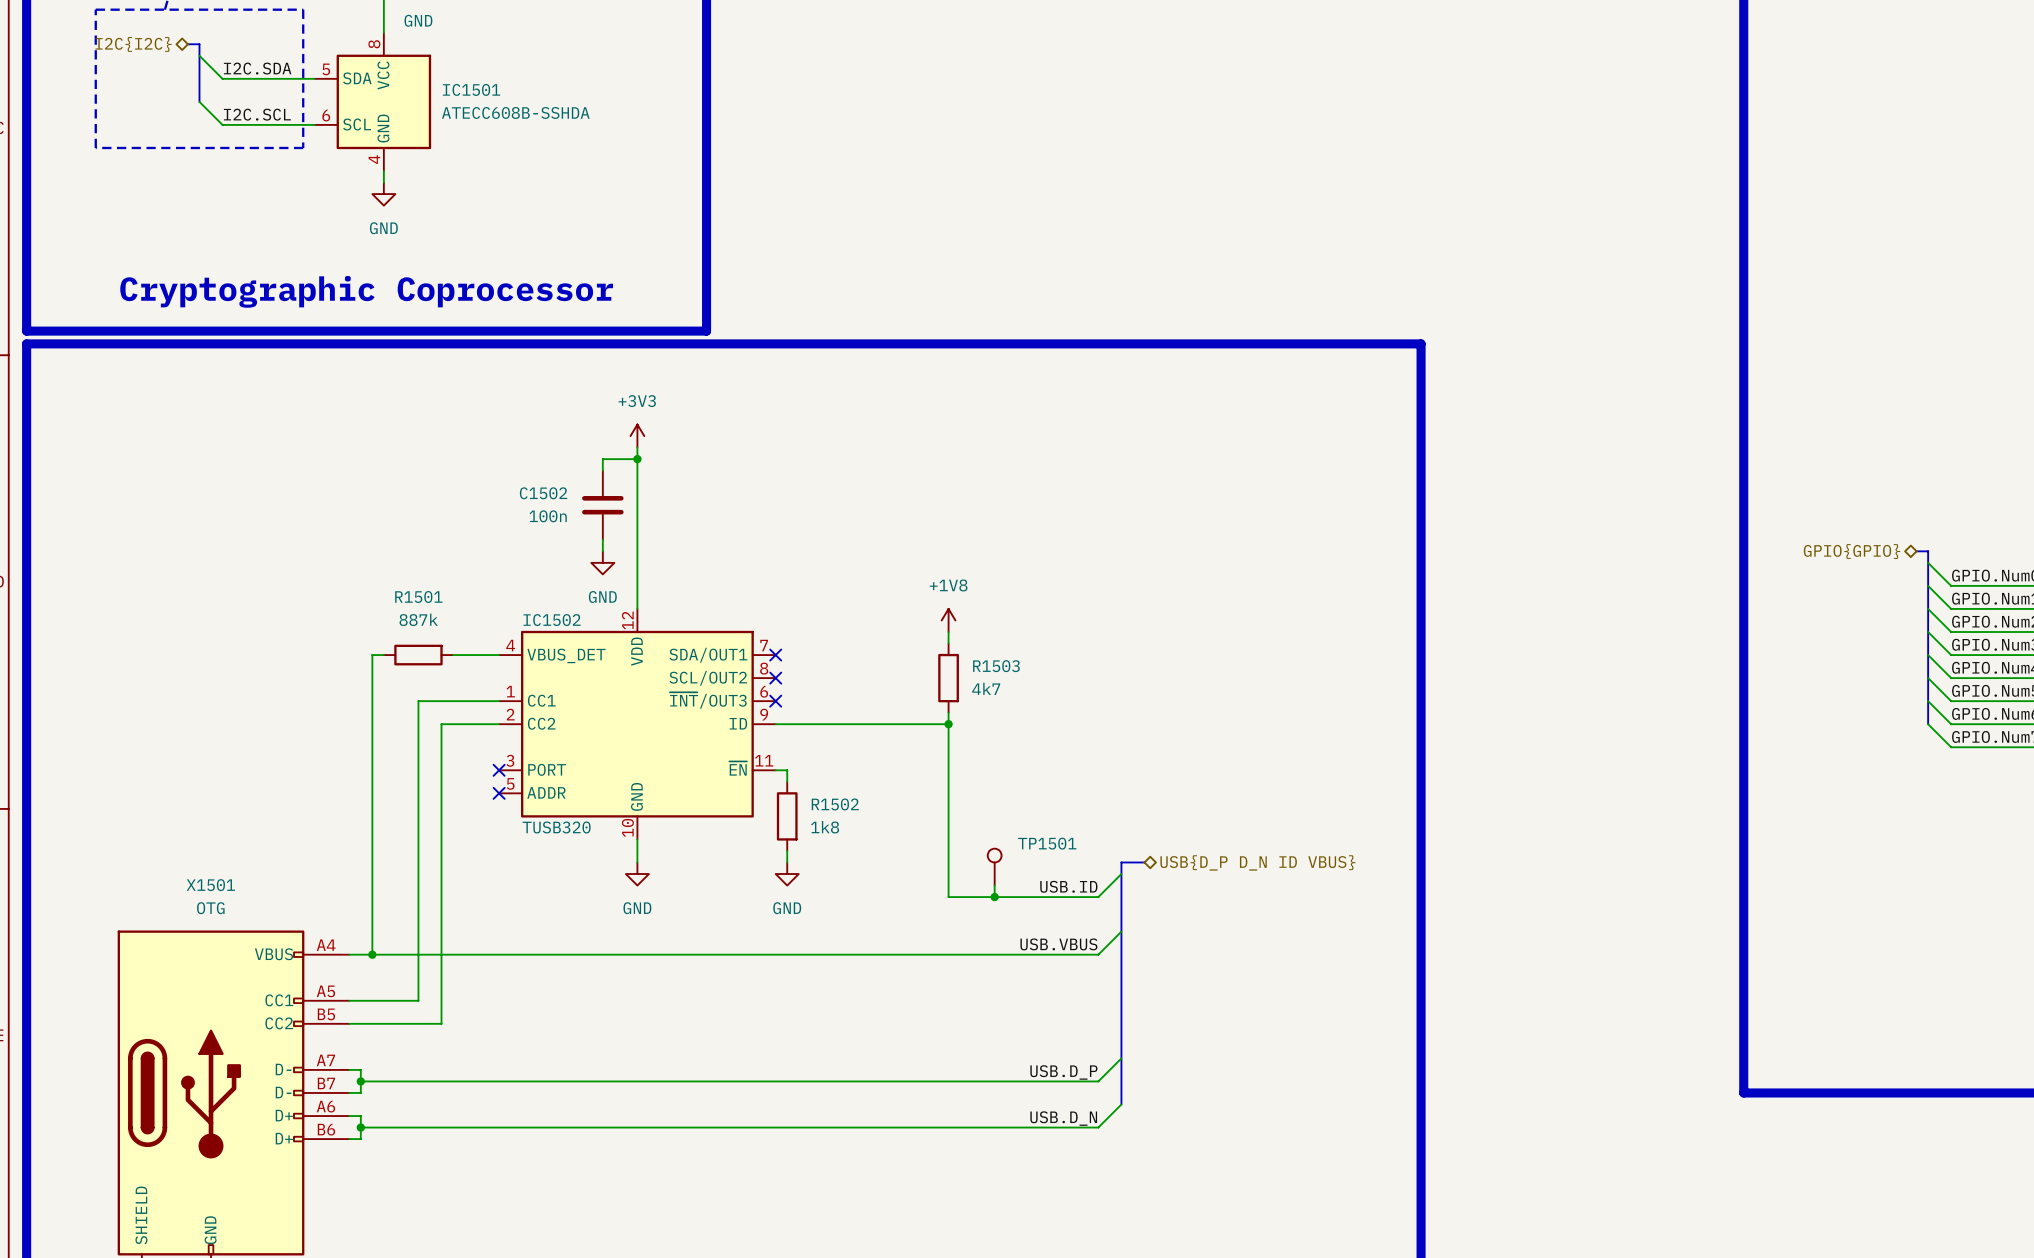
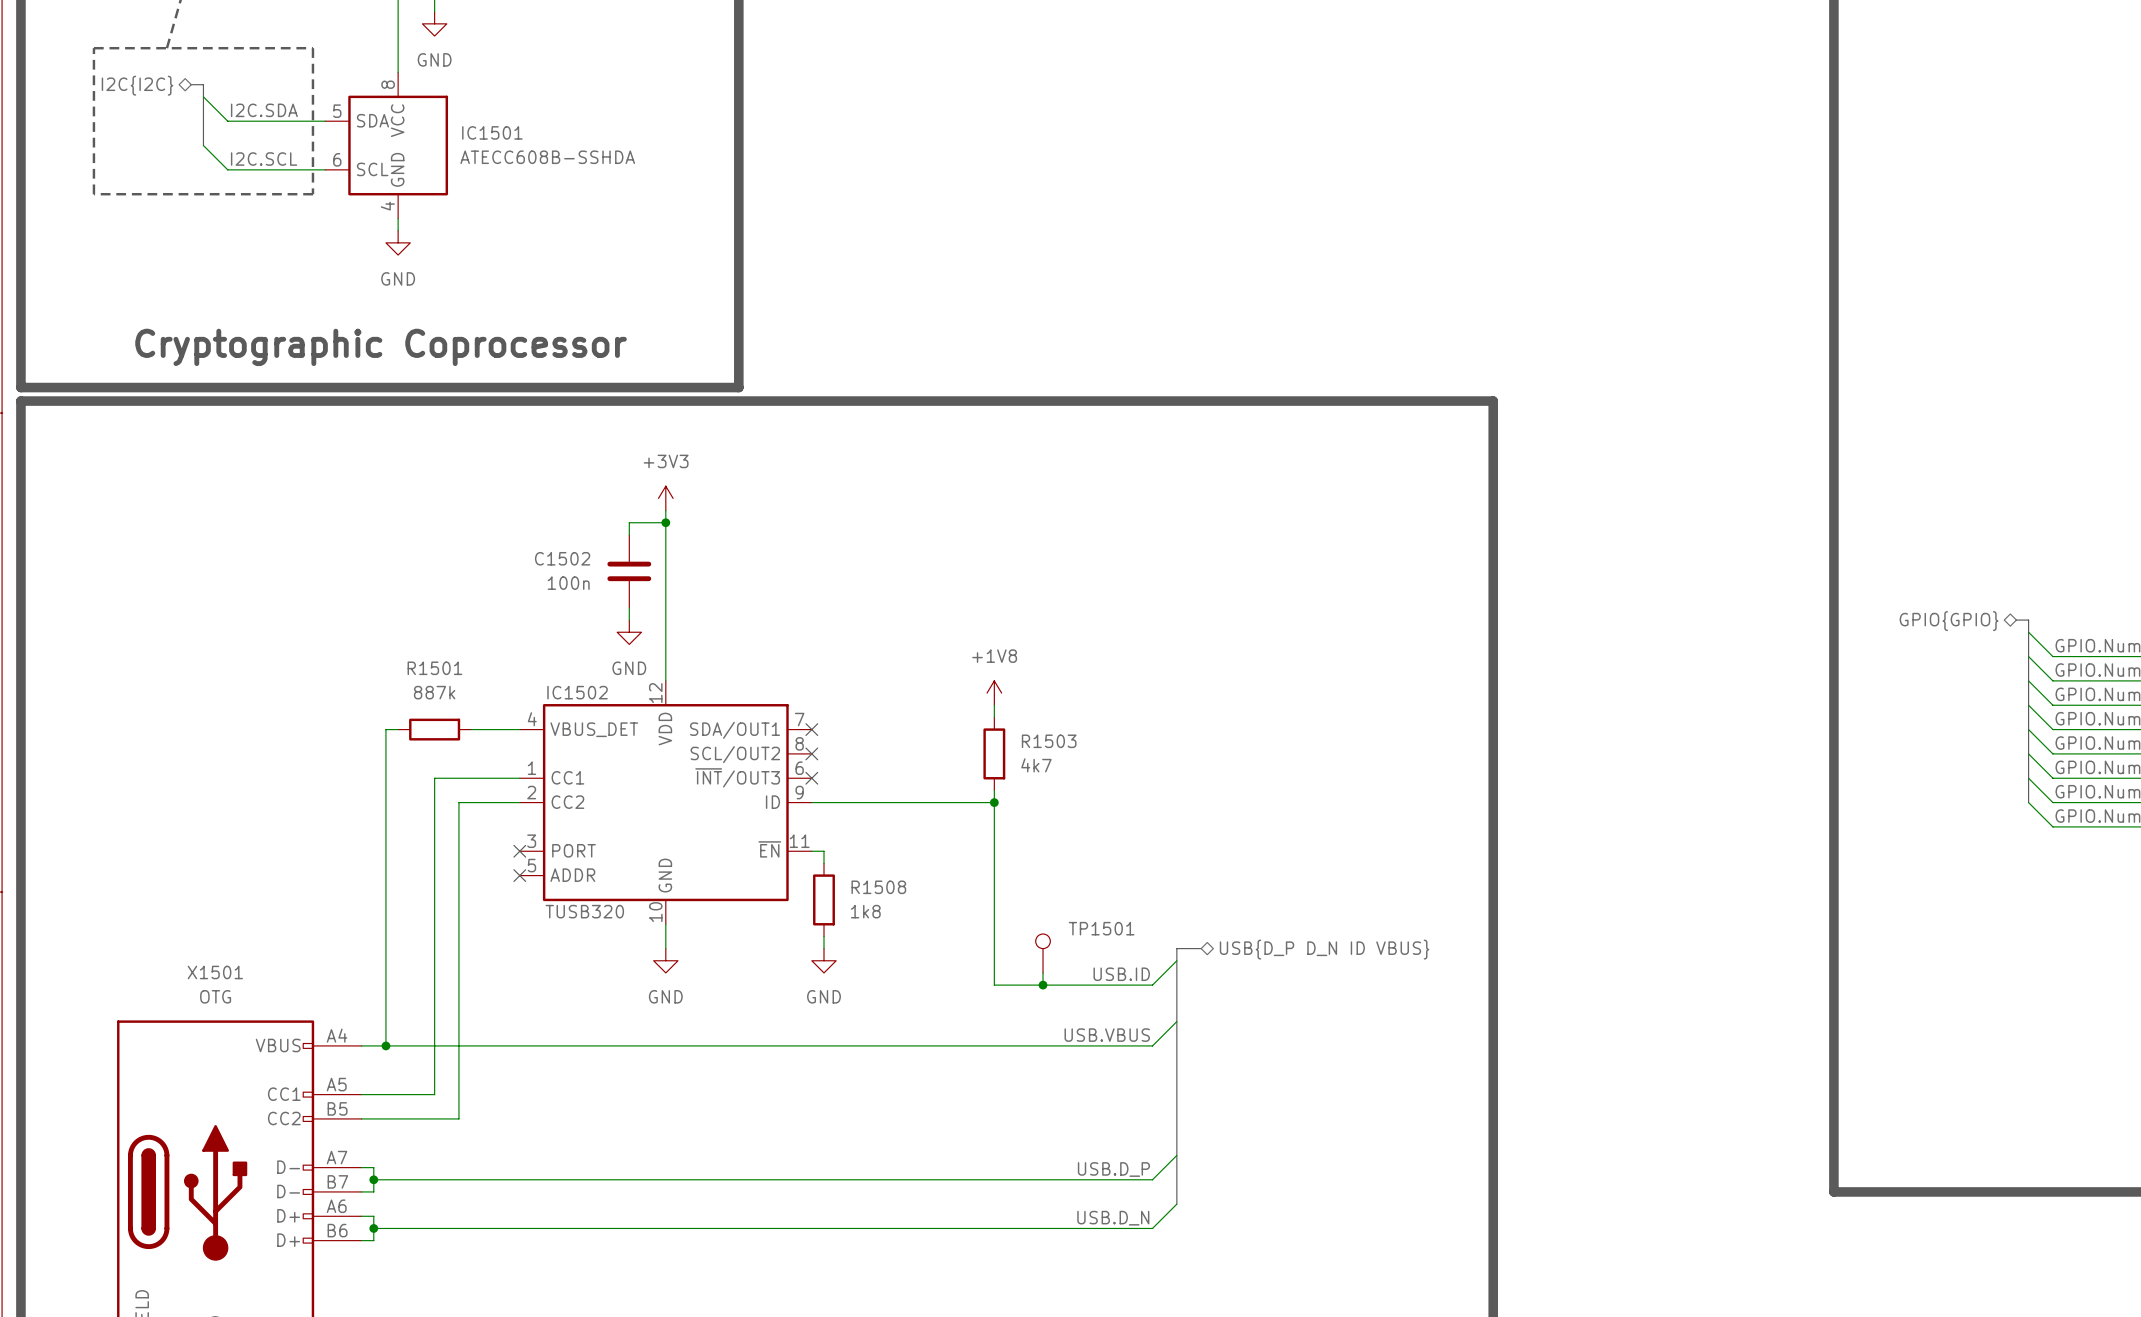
R1502 name: R1502 (835, 804) -> R1508 (878, 887)

